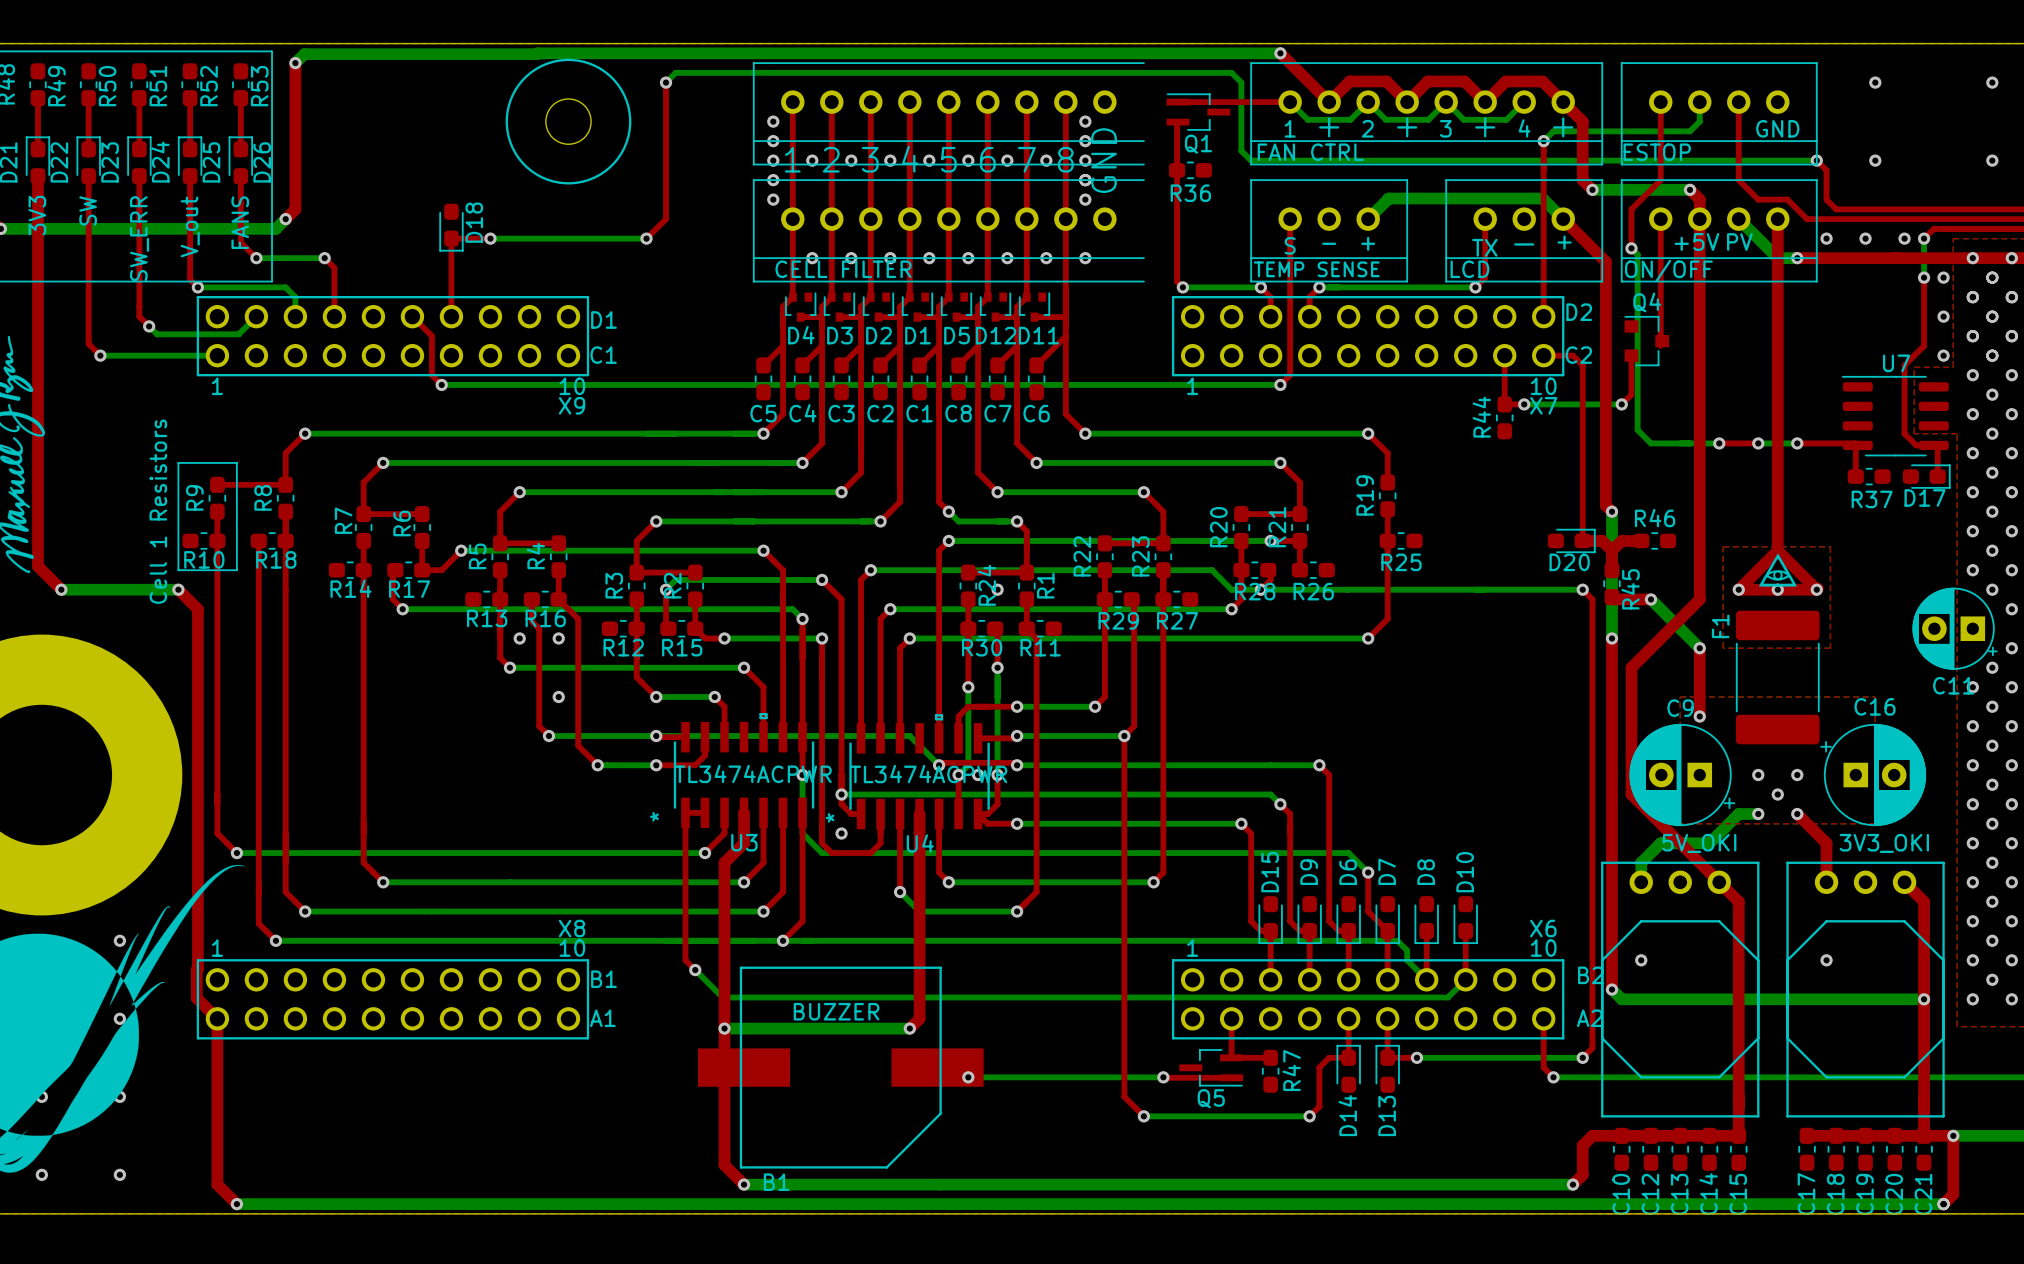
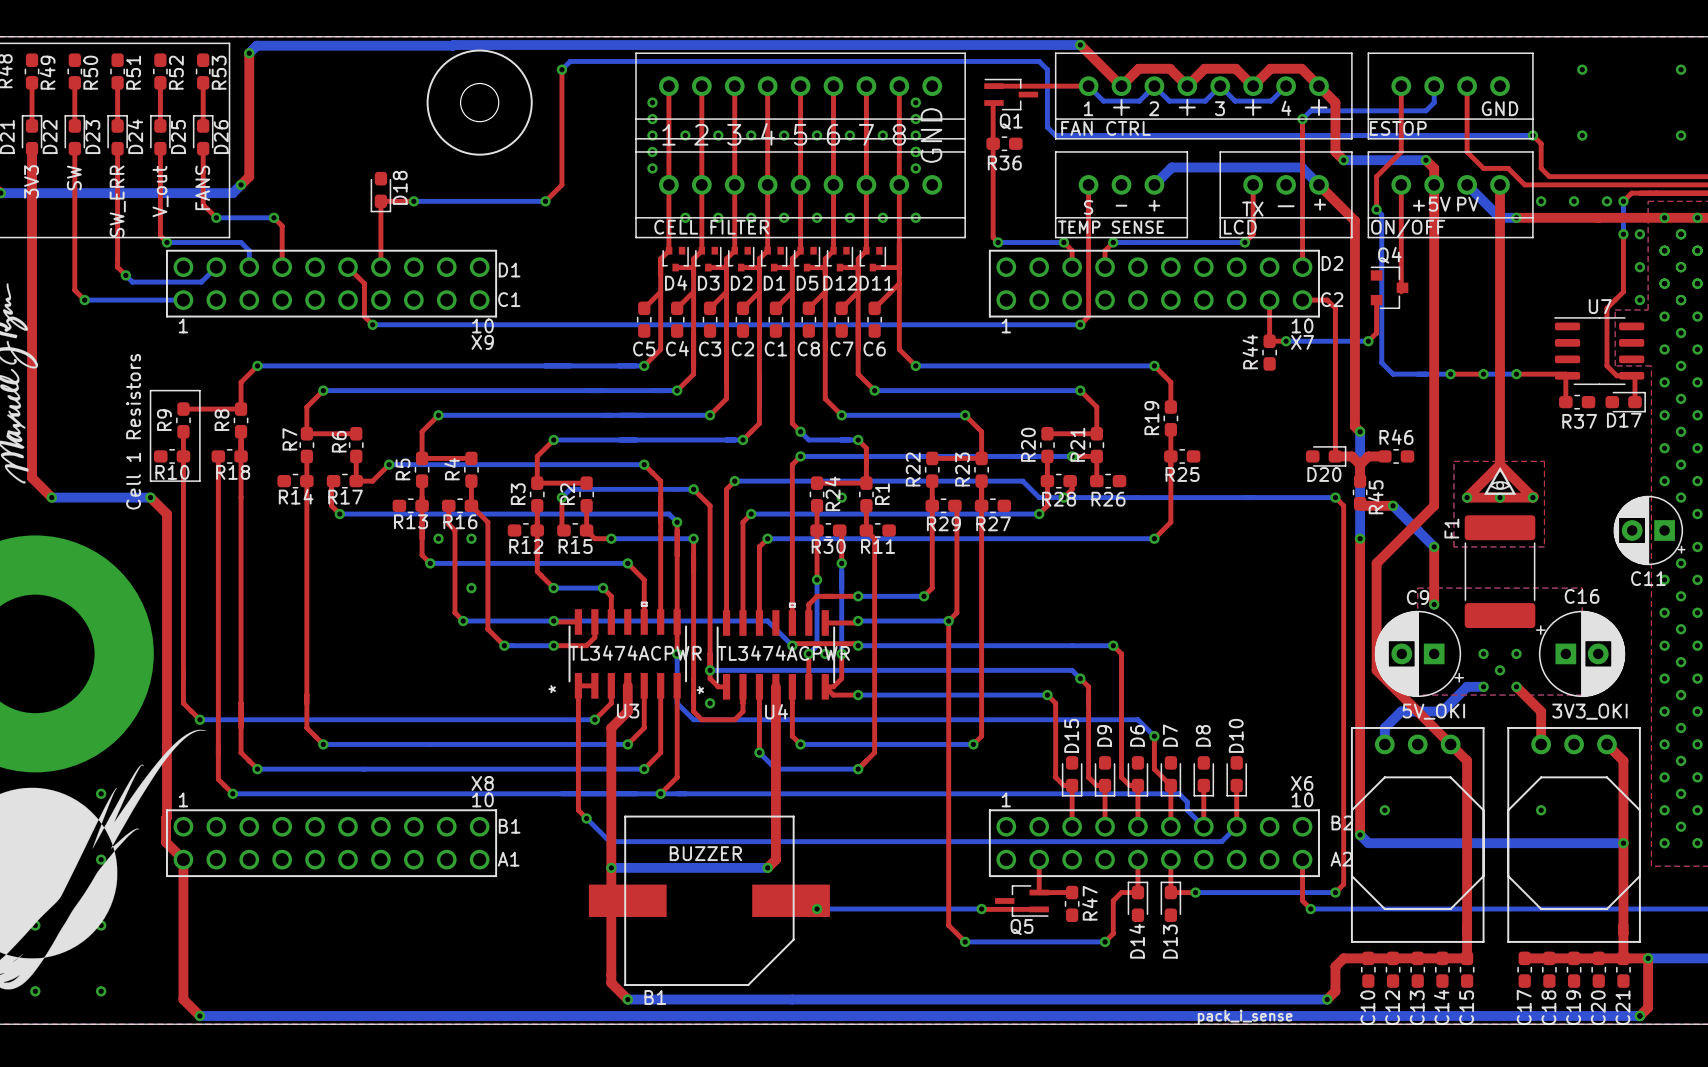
line: none -> (965, 53) (965, 237)
line: none -> (636, 138) (636, 151)
text: none -> pack_i_sense (1245, 1017)

